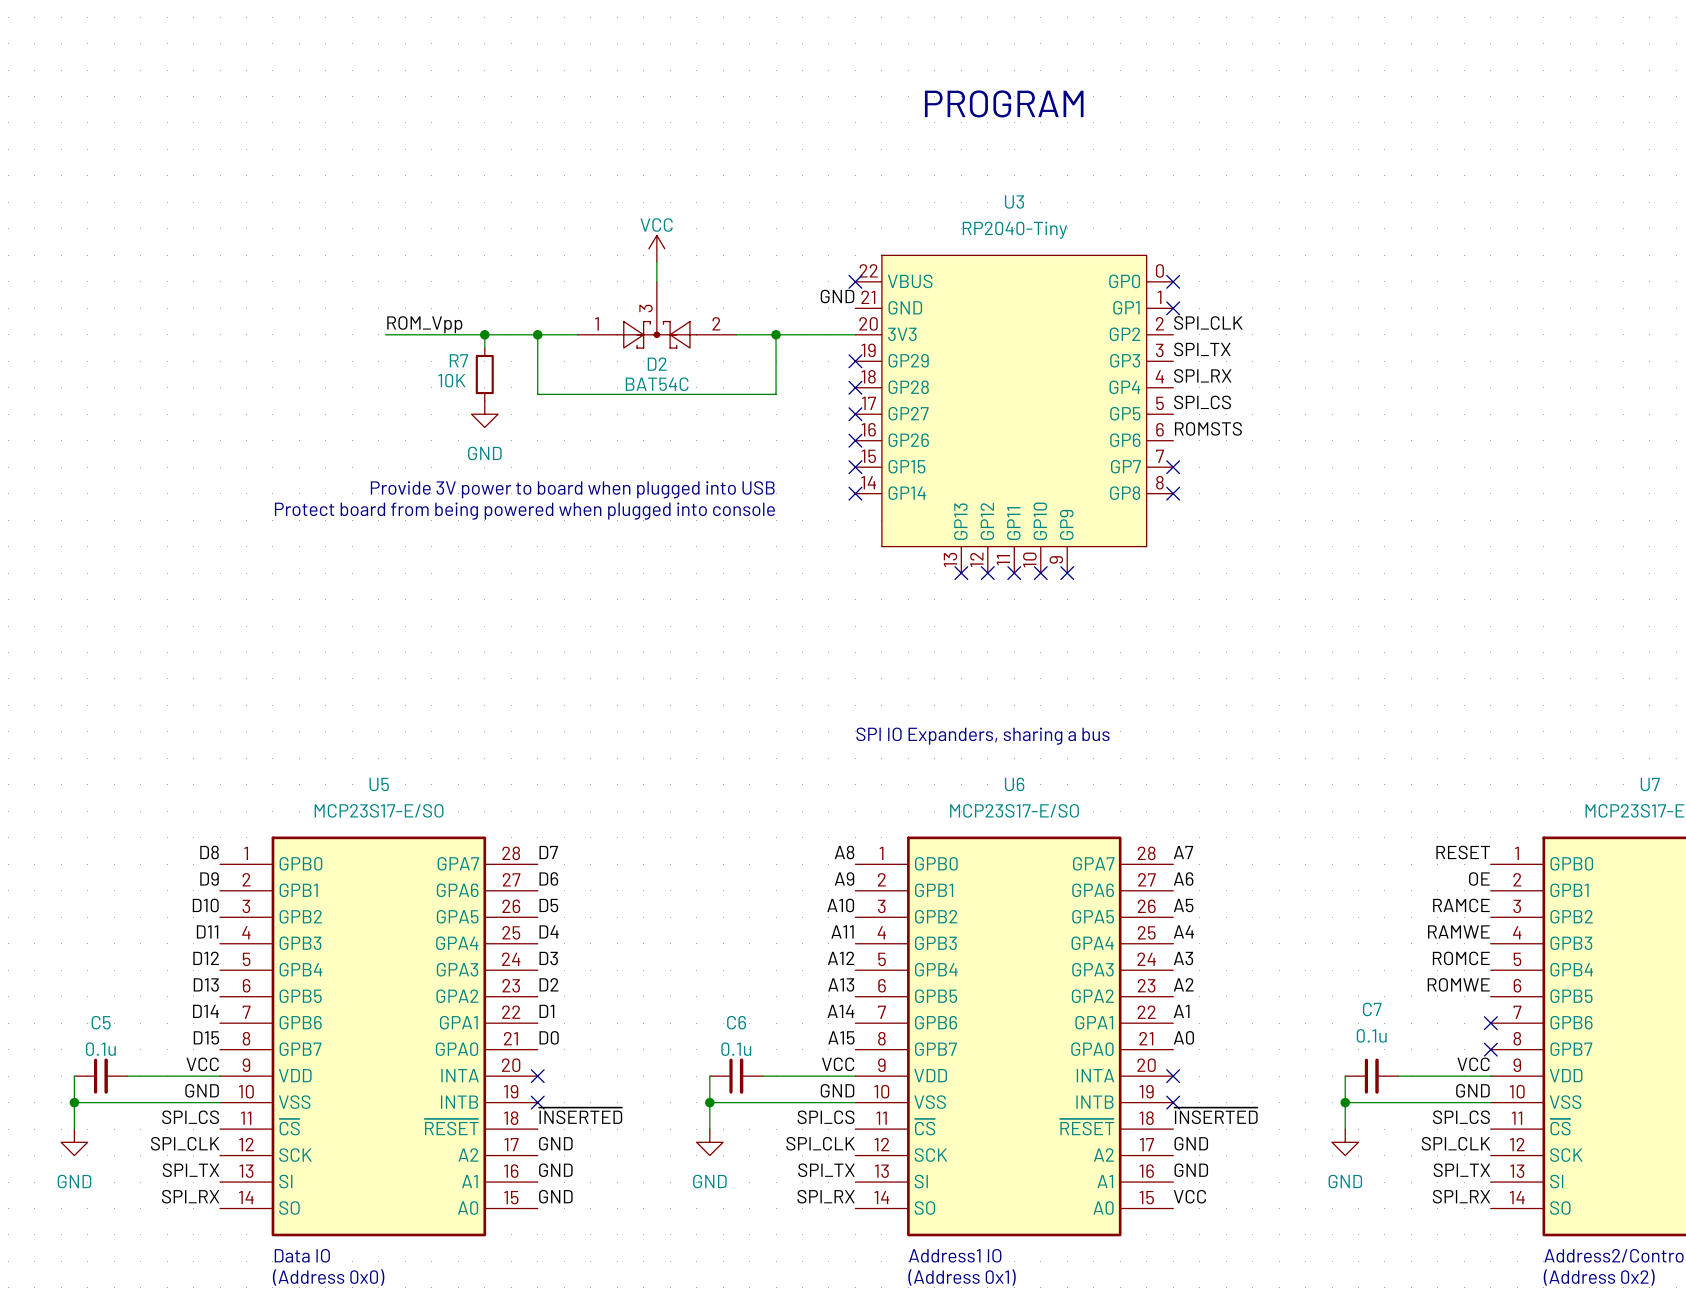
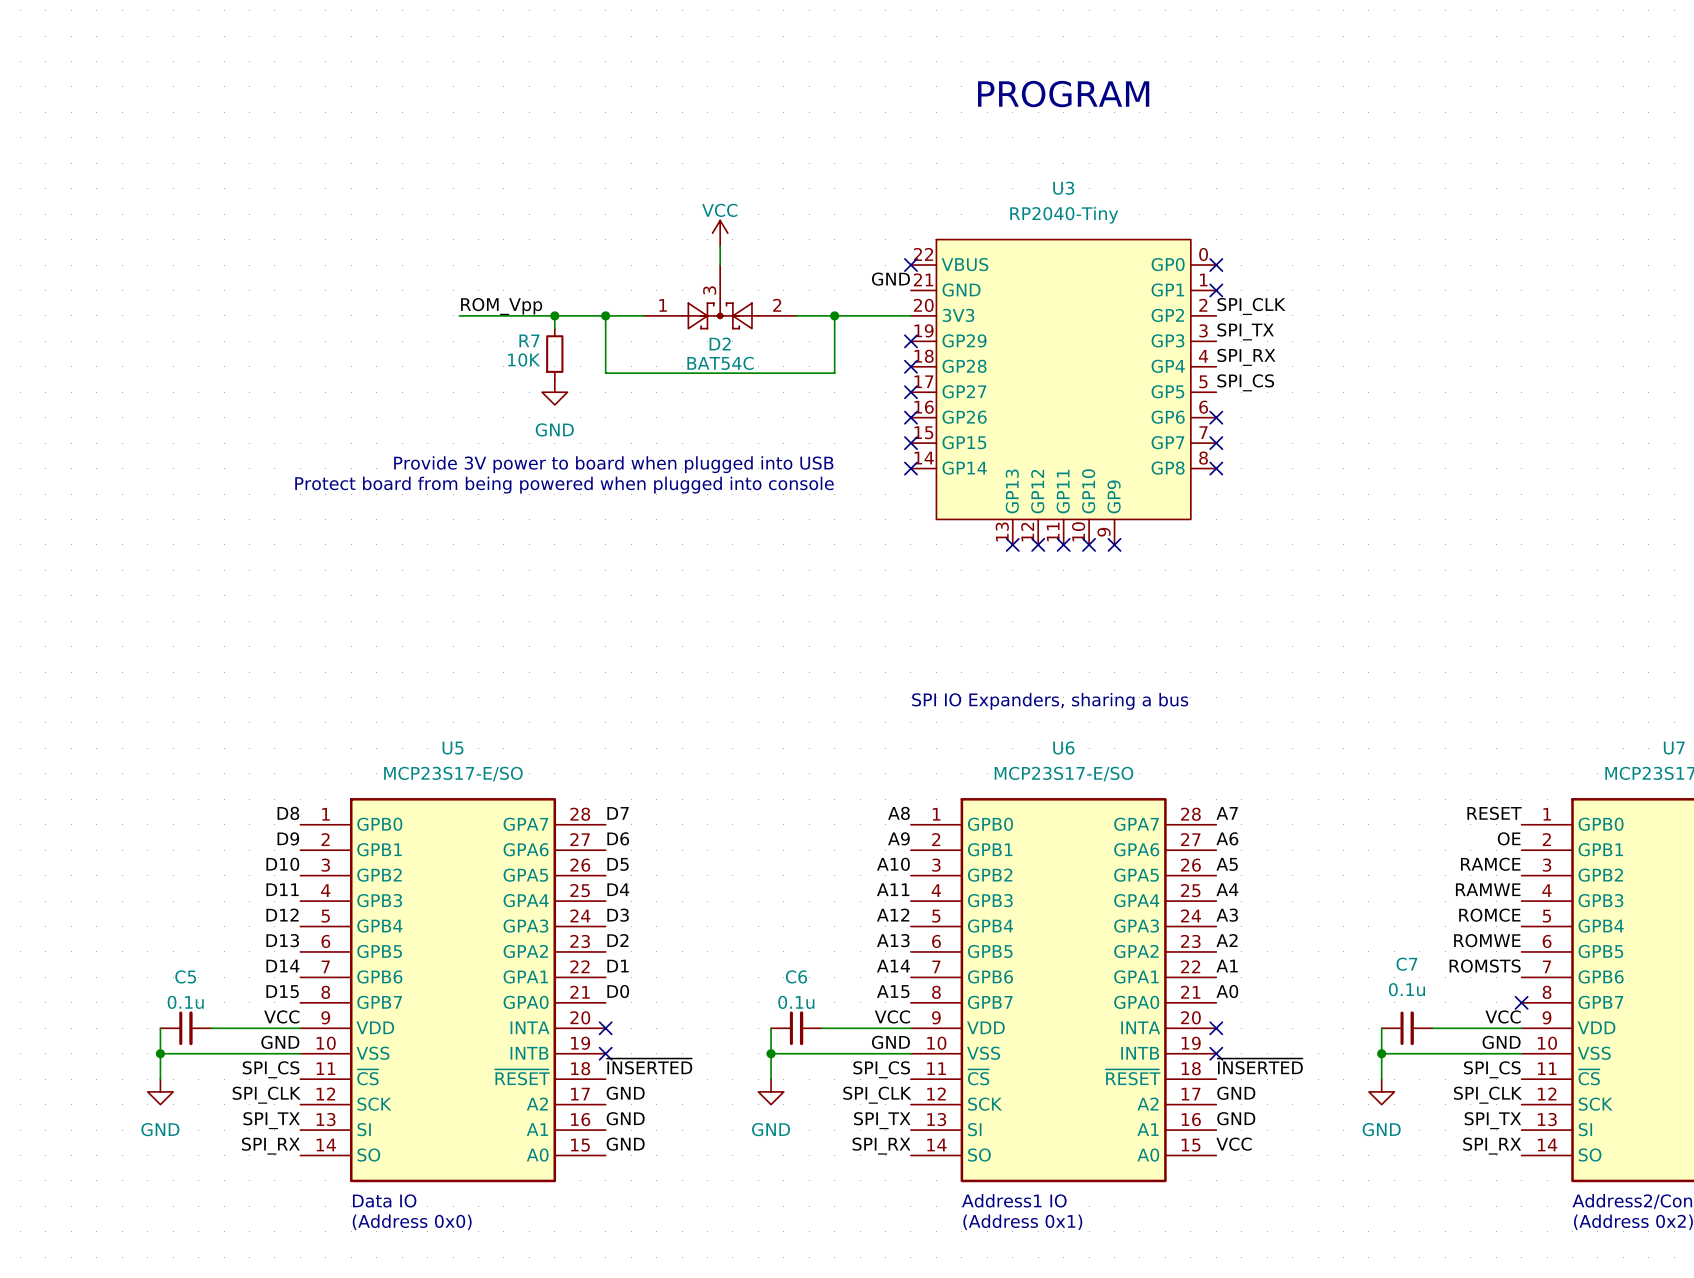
label: ROMSTS (1208, 428) -> none
no-connect mark: none -> (1216, 417)
label: none -> ROMSTS (1485, 966)
no-connect mark: (1490, 1023) -> none

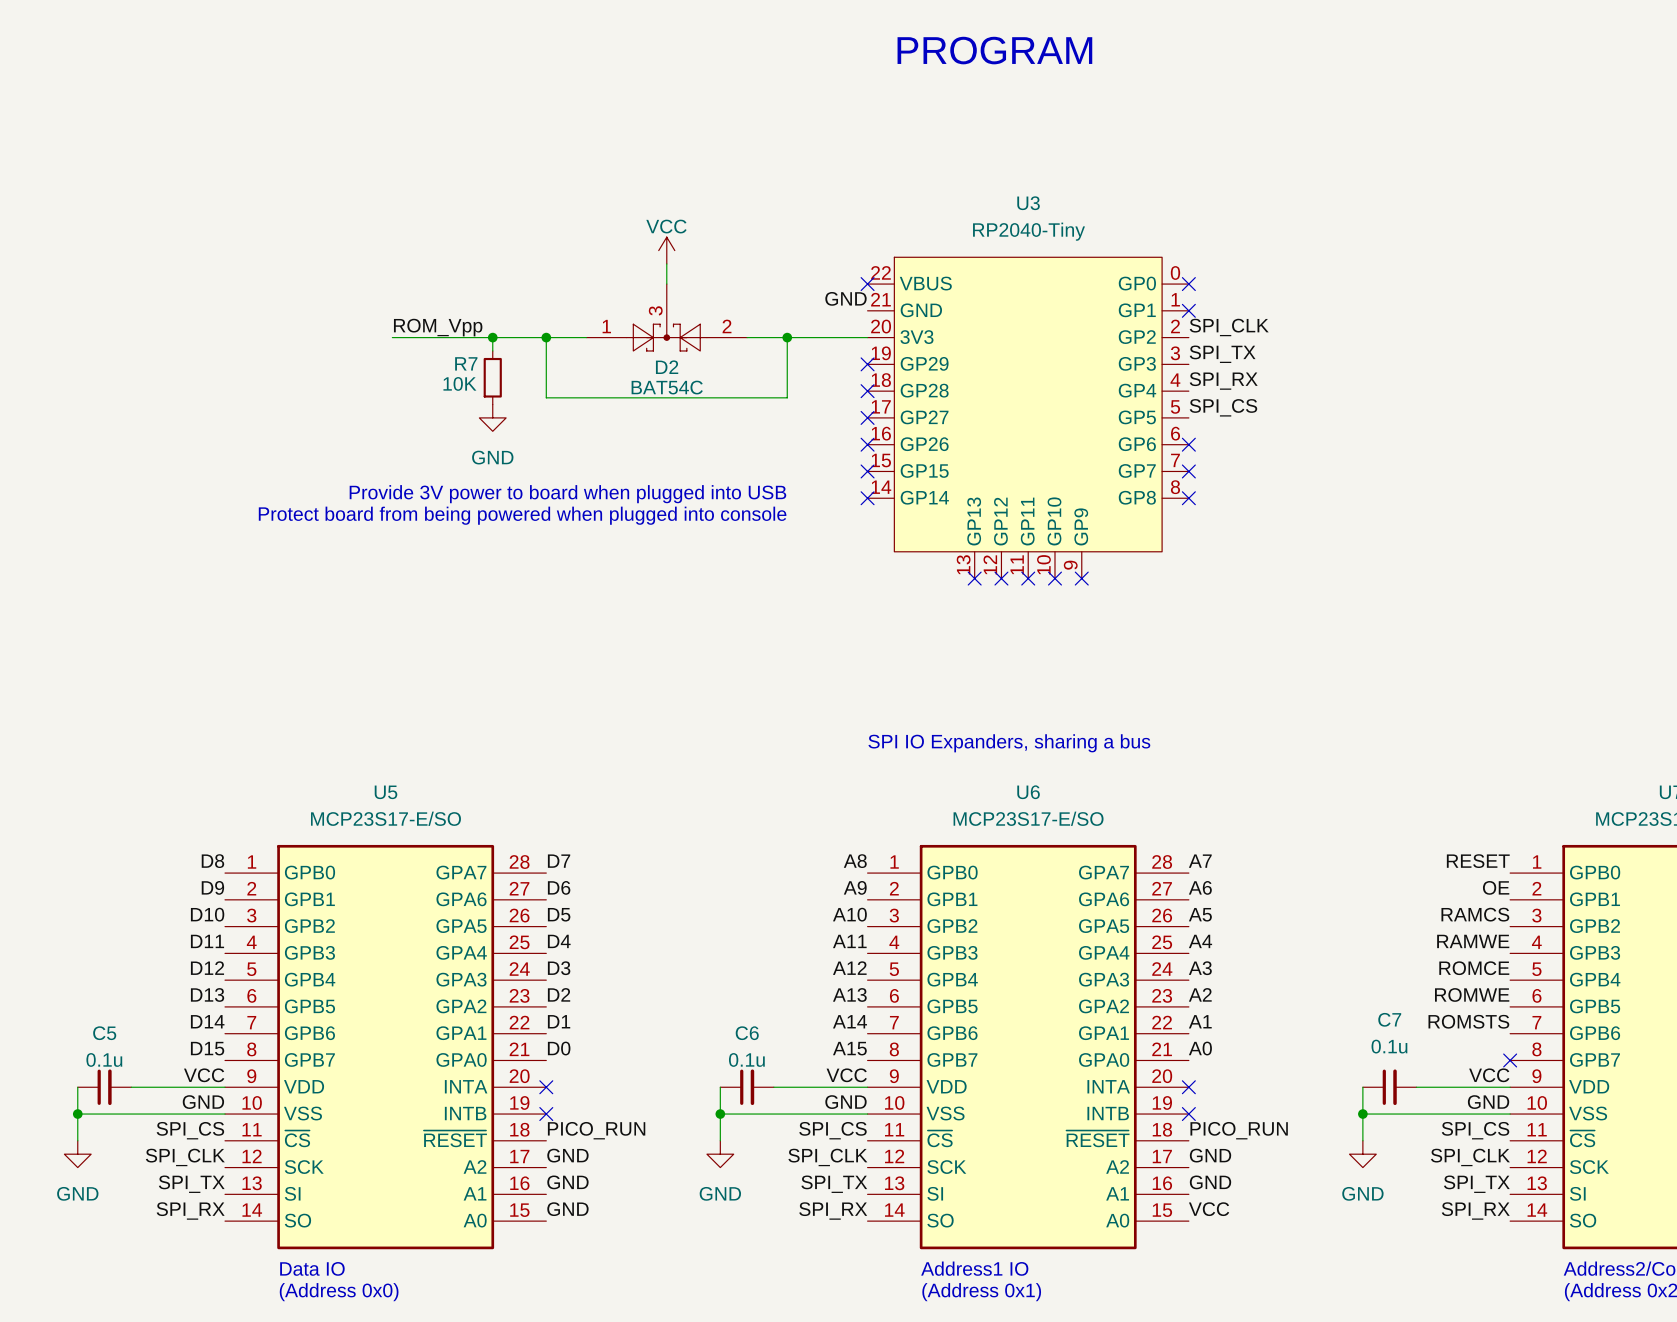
text position: PROGRAM (1063, 94) -> PROGRAM (994, 50)
label: RAMCE (1490, 864) -> RAMCS (1475, 914)
label: ~{INSERTED} (649, 1066) -> PICO_RUN (596, 1130)
label: ~{INSERTED} (1260, 1066) -> PICO_RUN (1239, 1130)

